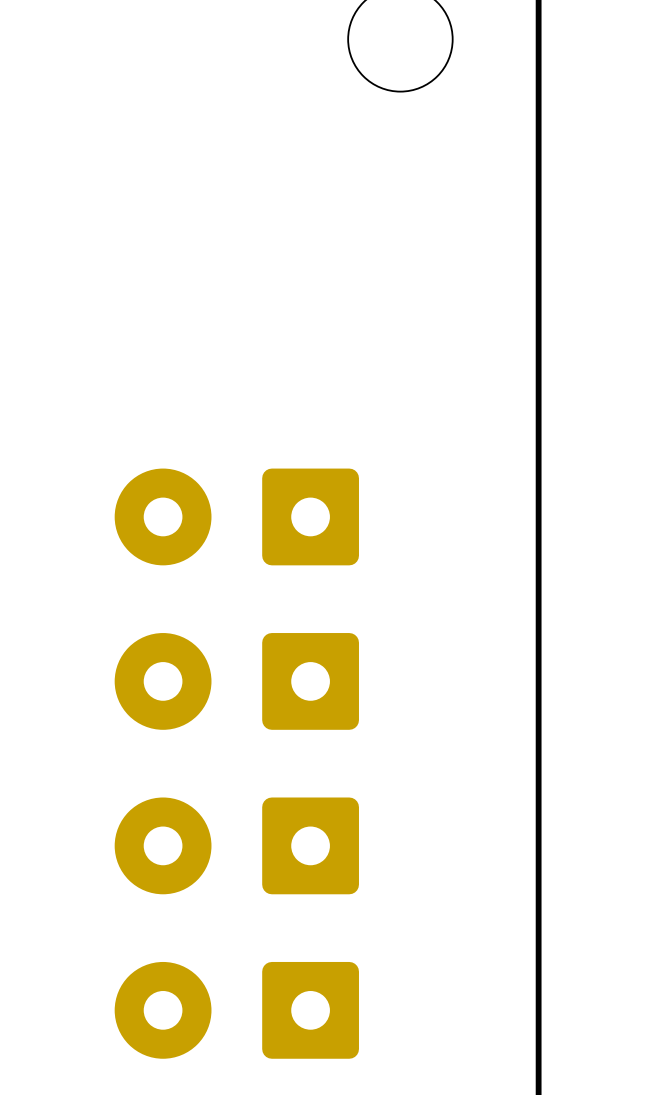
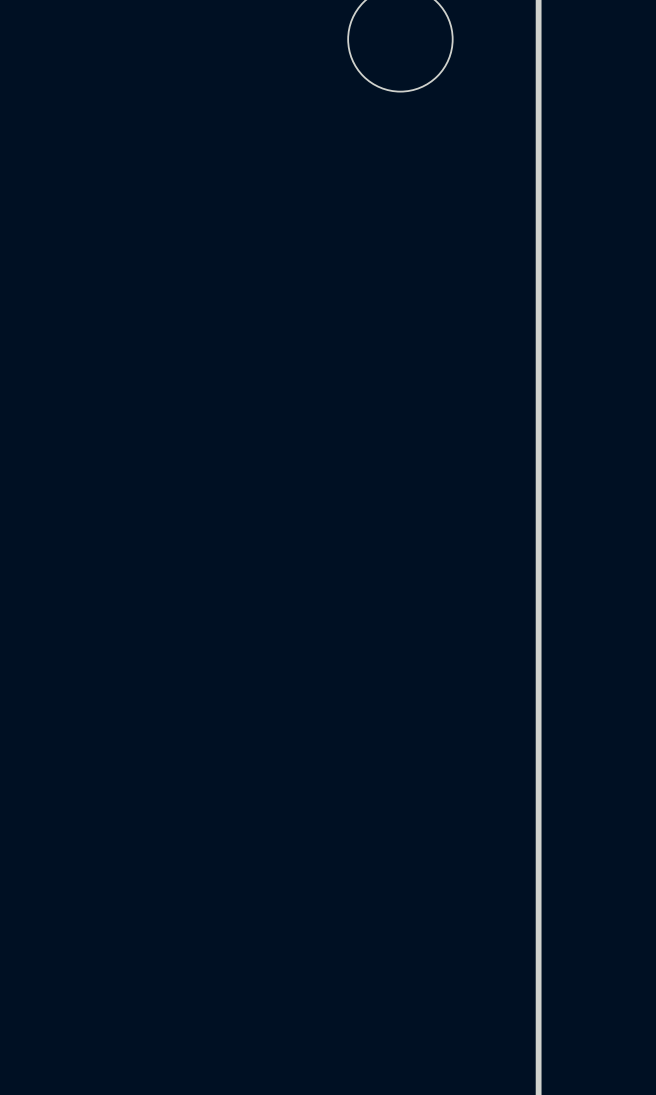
part: (236, 516) -> none
part: (236, 681) -> none
part: (236, 845) -> none
part: (236, 1010) -> none

